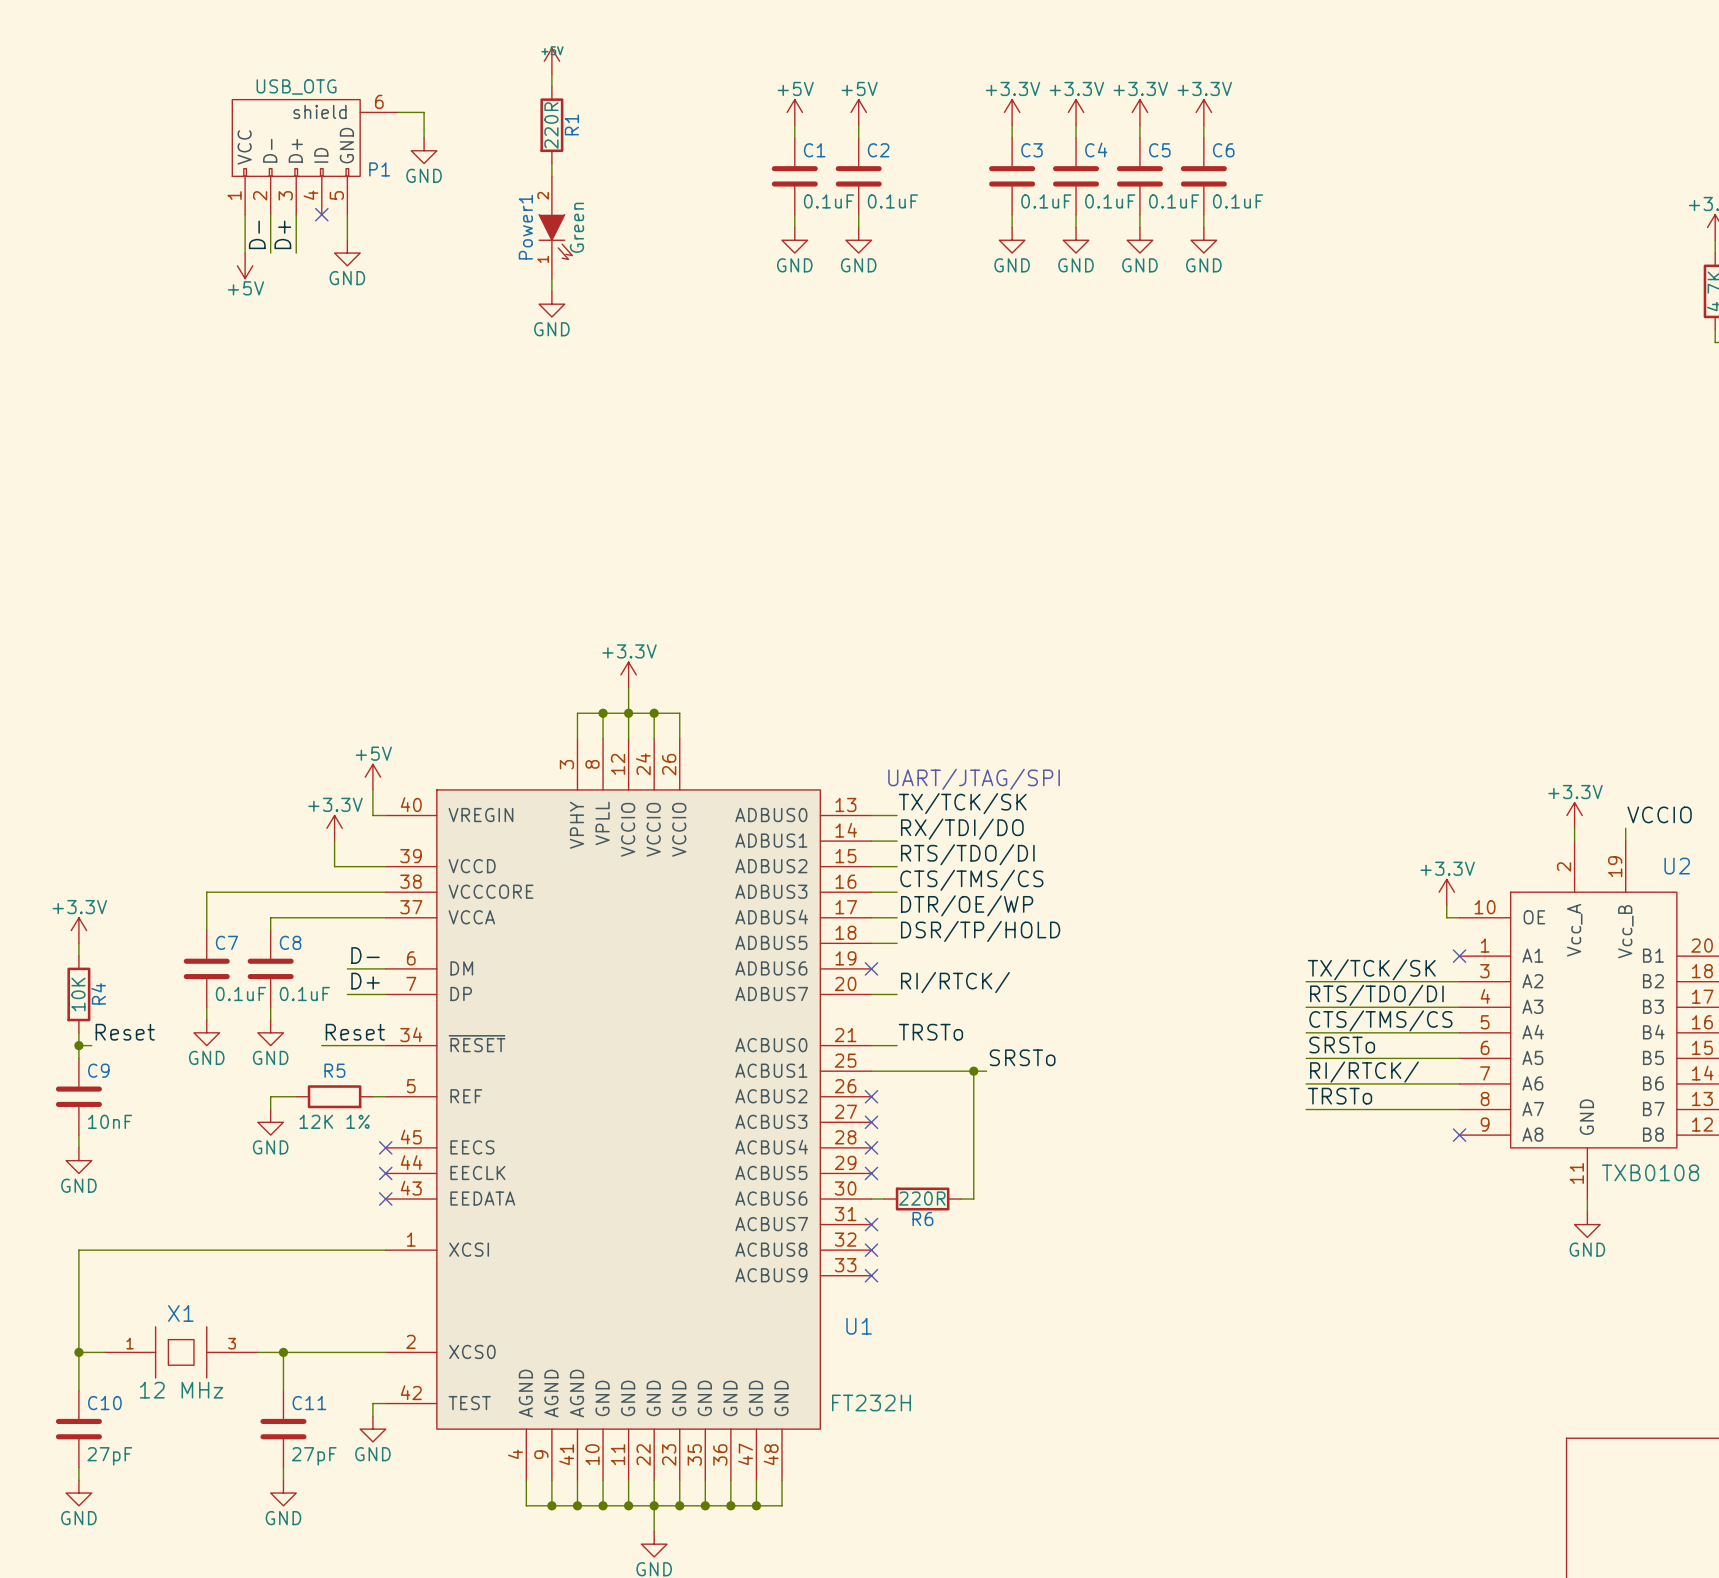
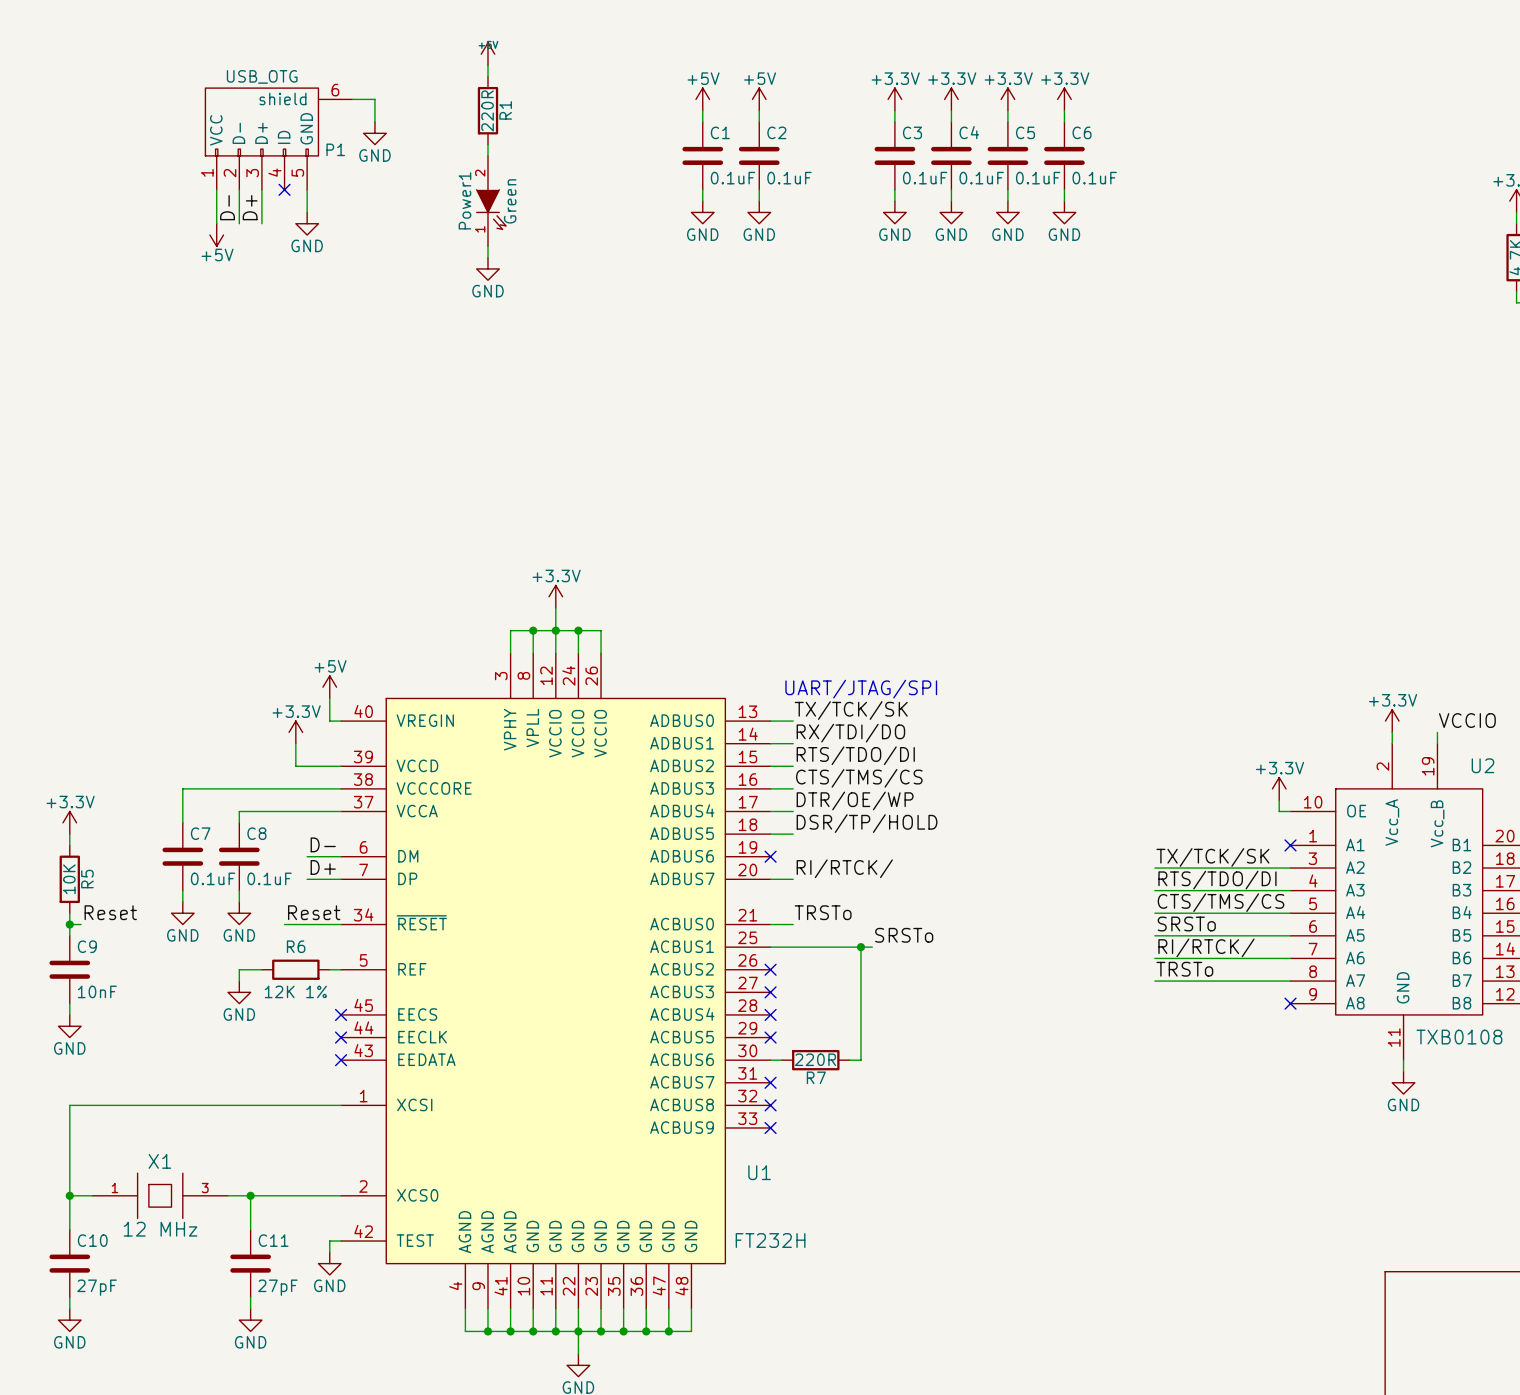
R4 name: R4 (98, 993) -> R5 (87, 879)
R5 name: R5 (334, 1070) -> R6 (296, 946)
R6 name: R6 (922, 1218) -> R7 (816, 1077)

